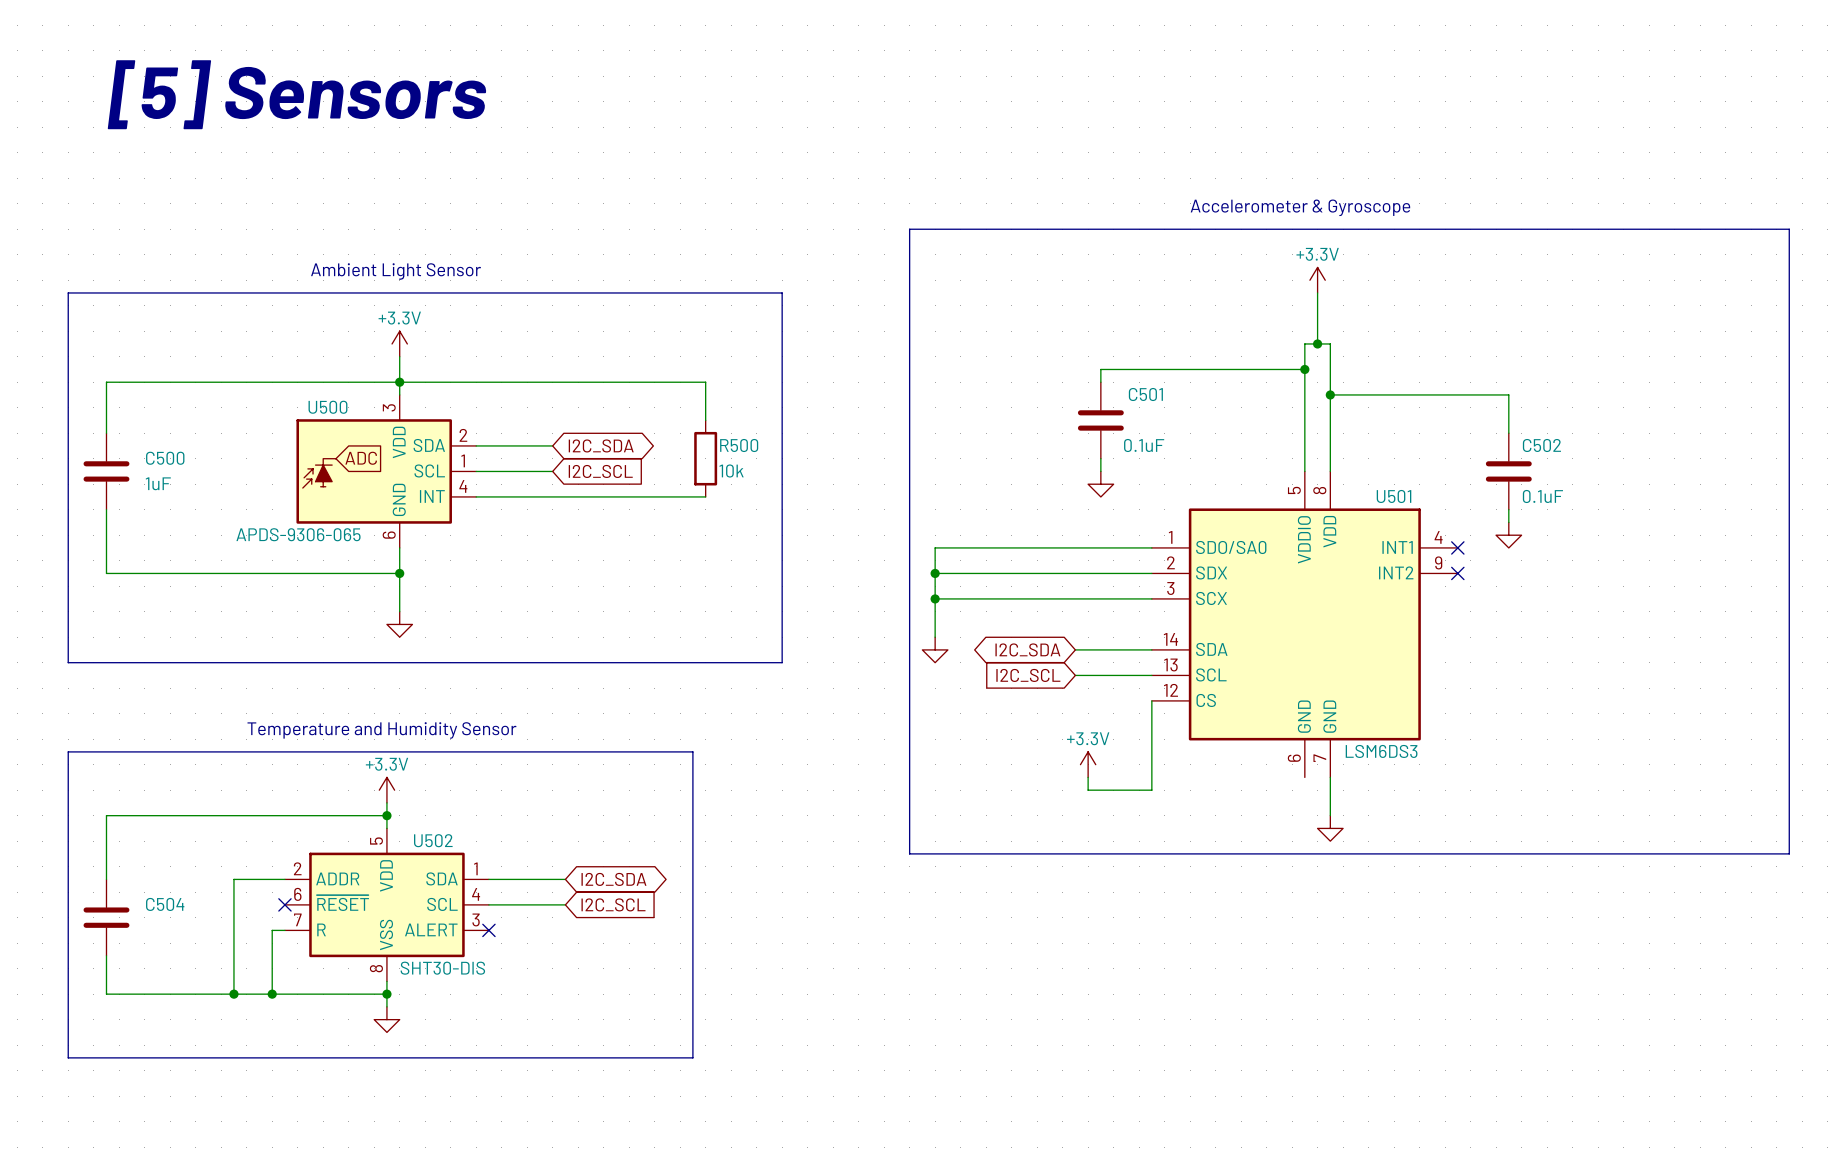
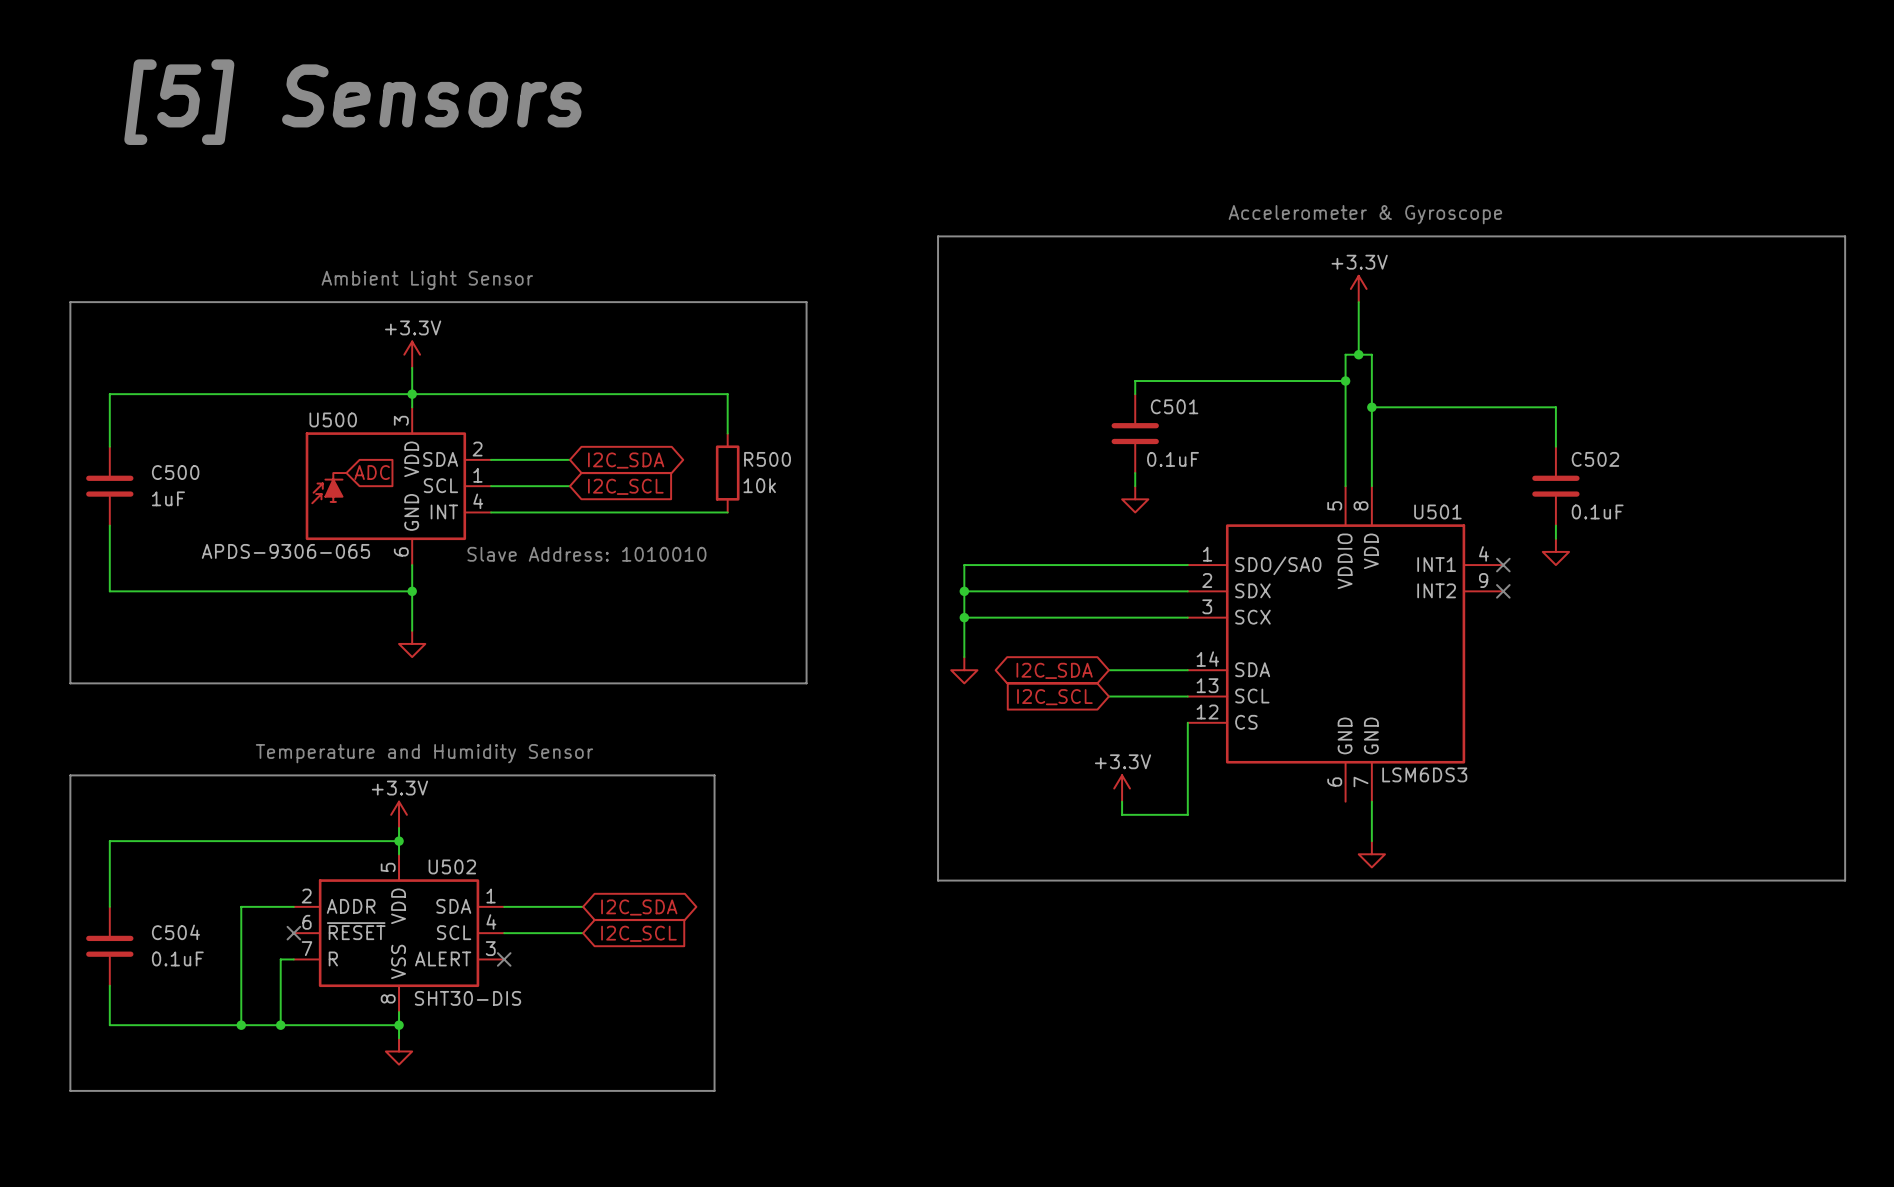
text: none -> Slave Address: 1010010 (586, 554)
C504 value: none -> 0.1uF (177, 958)

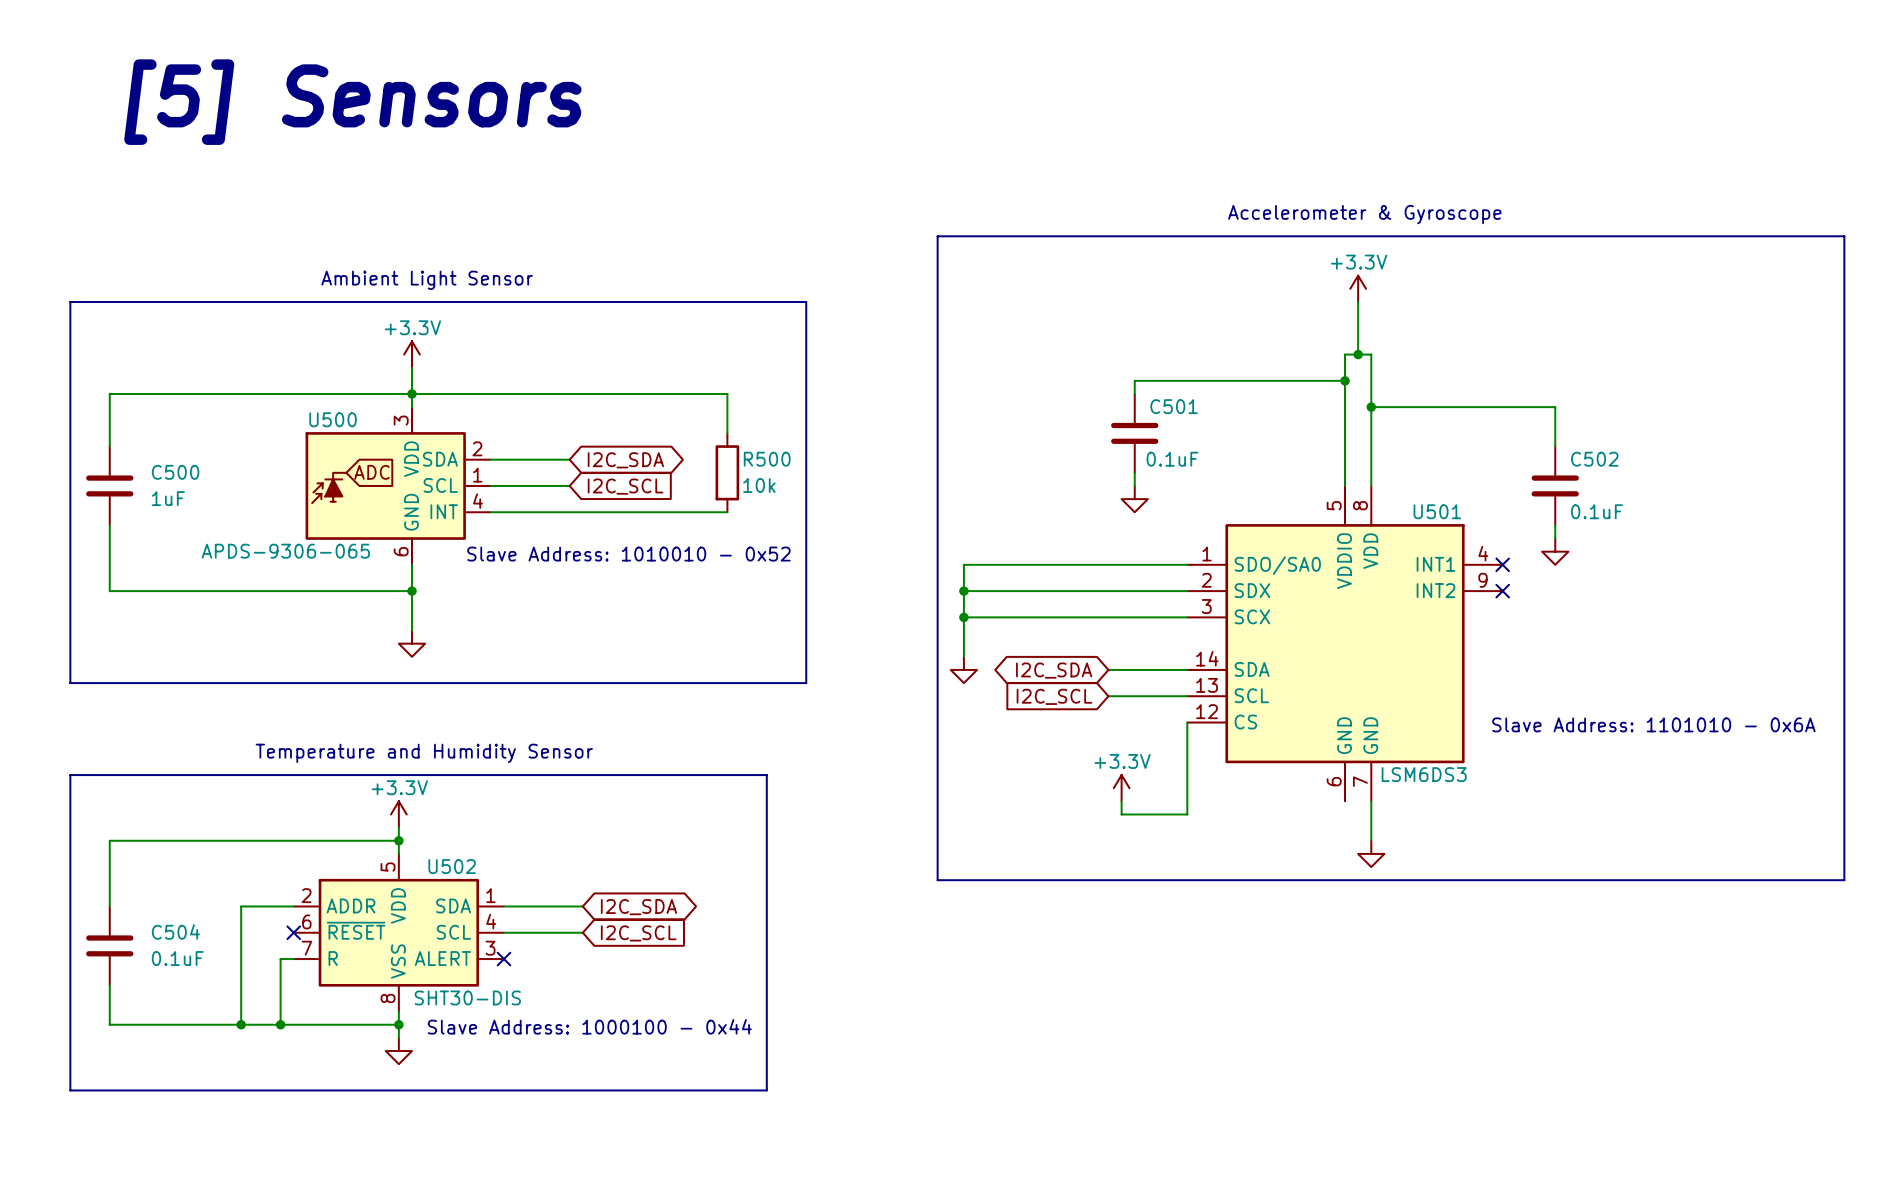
text: Slave Address: 1010010 (586, 554) -> Slave Address: 1010010 - 0x52 (628, 554)
text: none -> Slave Address: 1101010 - 0x6A (1653, 724)
line: (714, 775) (714, 1090) -> (714, 775) (766, 775) (766, 1090) (714, 1090)
text: none -> Slave Address: 1000100 - 0x44 (589, 1026)

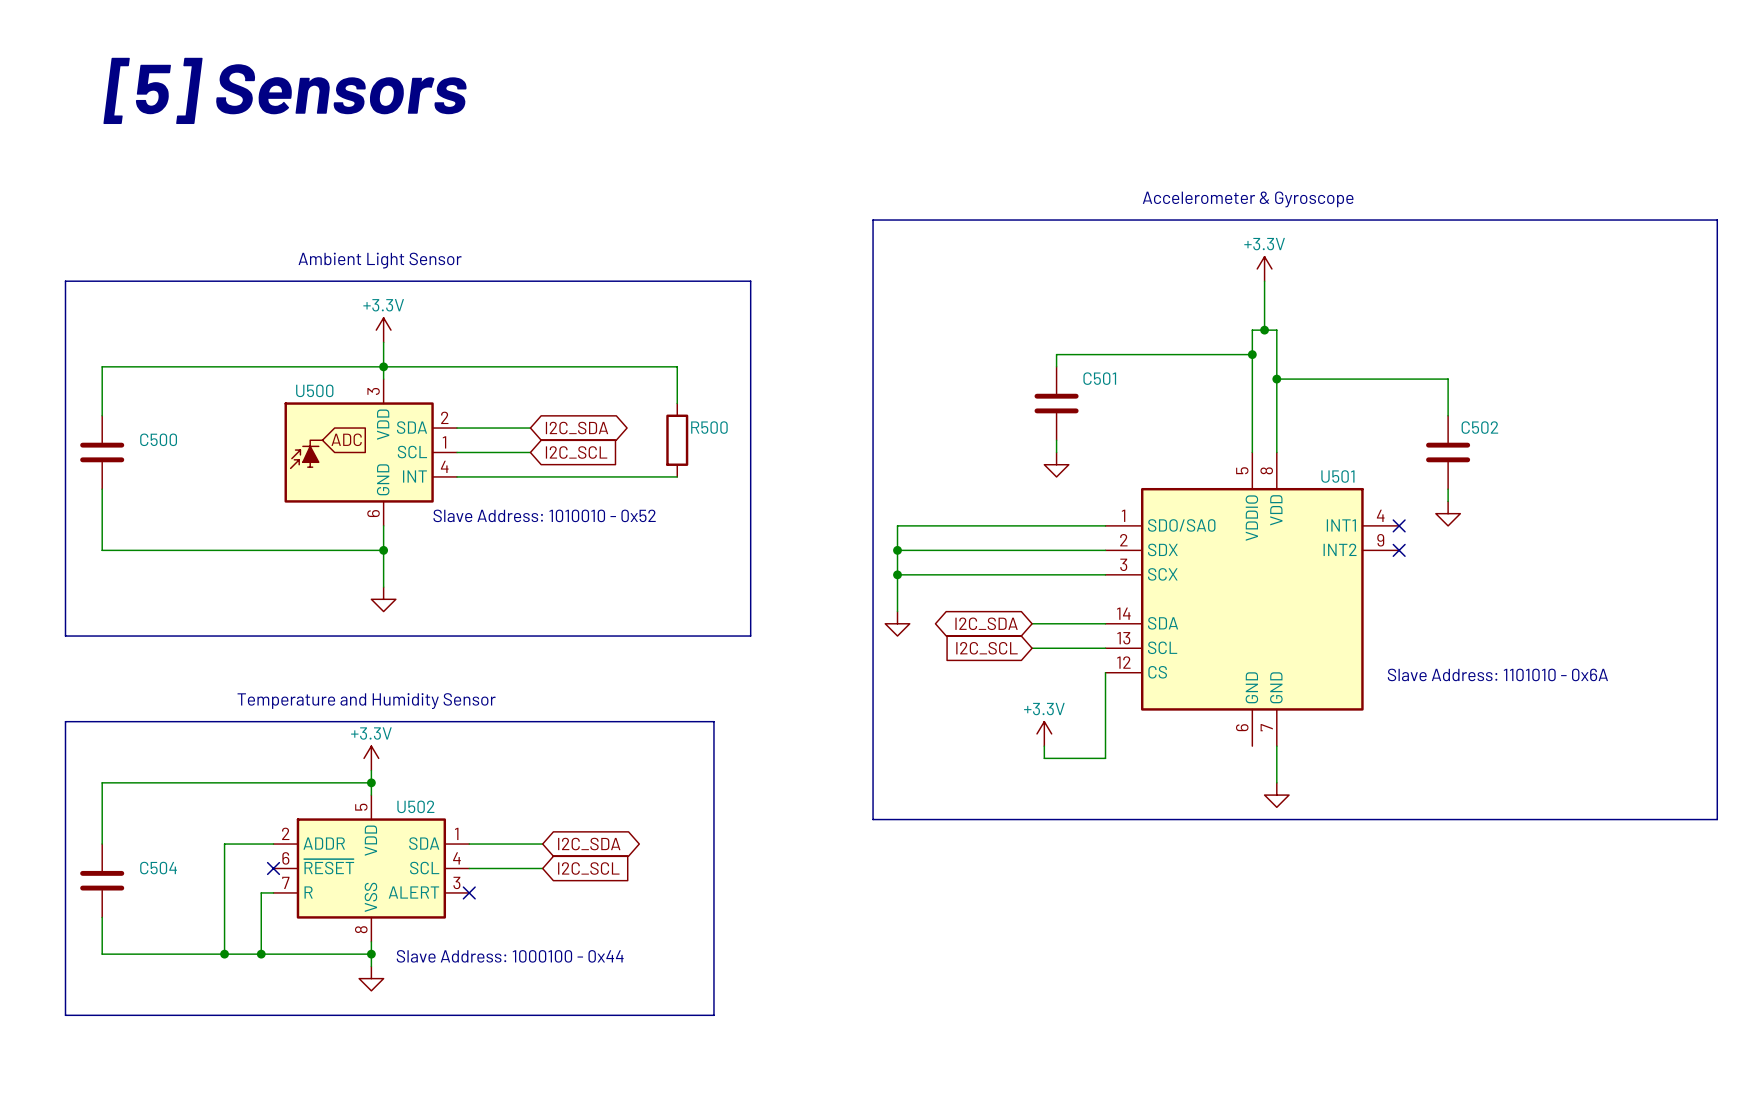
C501 value: 0.1uF (1172, 459) -> none
R500 value: 10k (759, 485) -> none
C500 value: 1uF (168, 498) -> none
C502 value: 0.1uF (1596, 511) -> none
U500 value: APDS-9306-065 (285, 551) -> none
U501 value: LSM6DS3 (1424, 774) -> none
C504 value: 0.1uF (177, 958) -> none
U502 value: SHT30-DIS (467, 997) -> none

